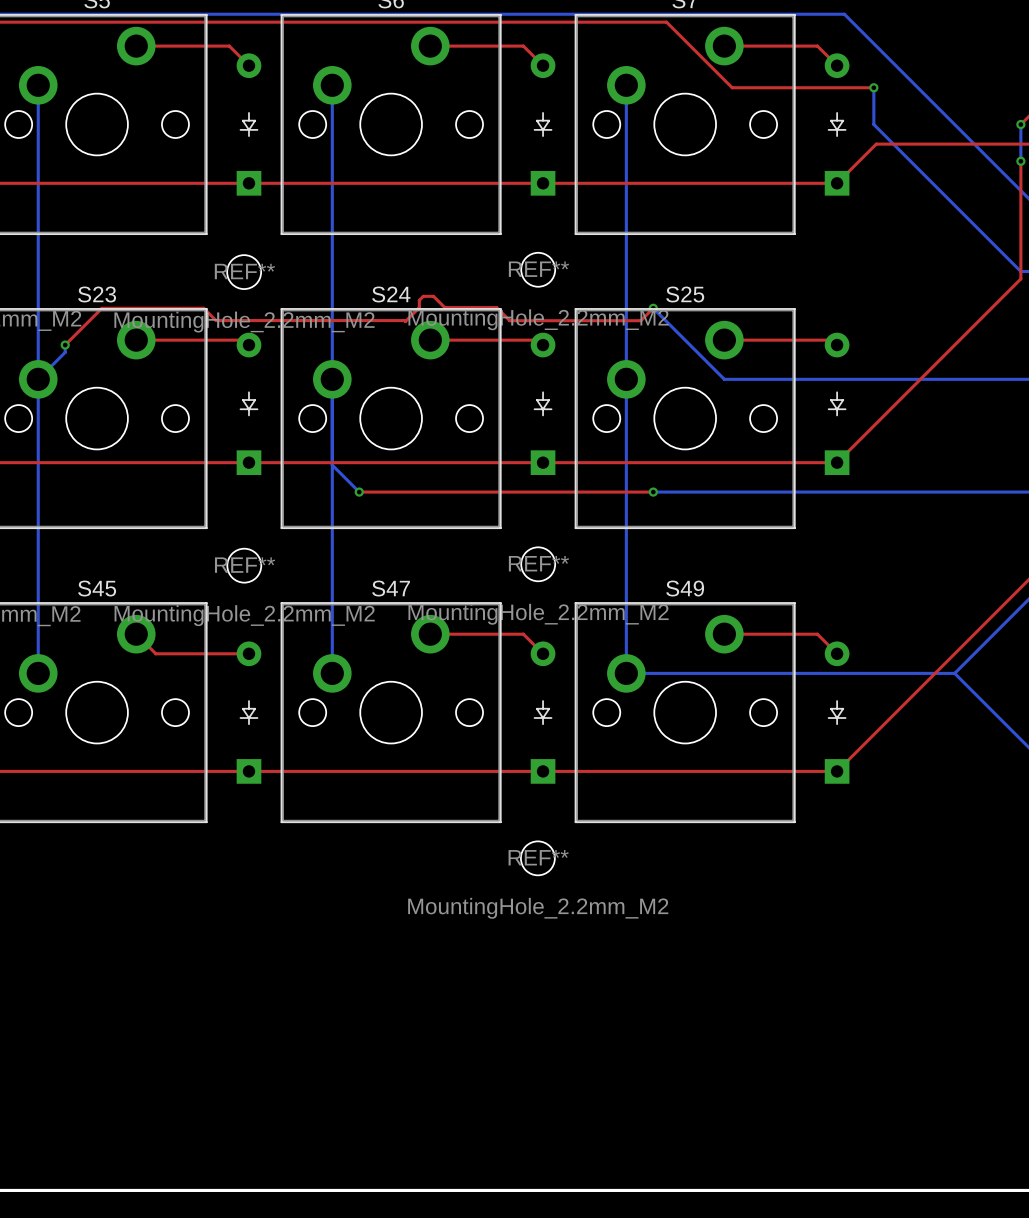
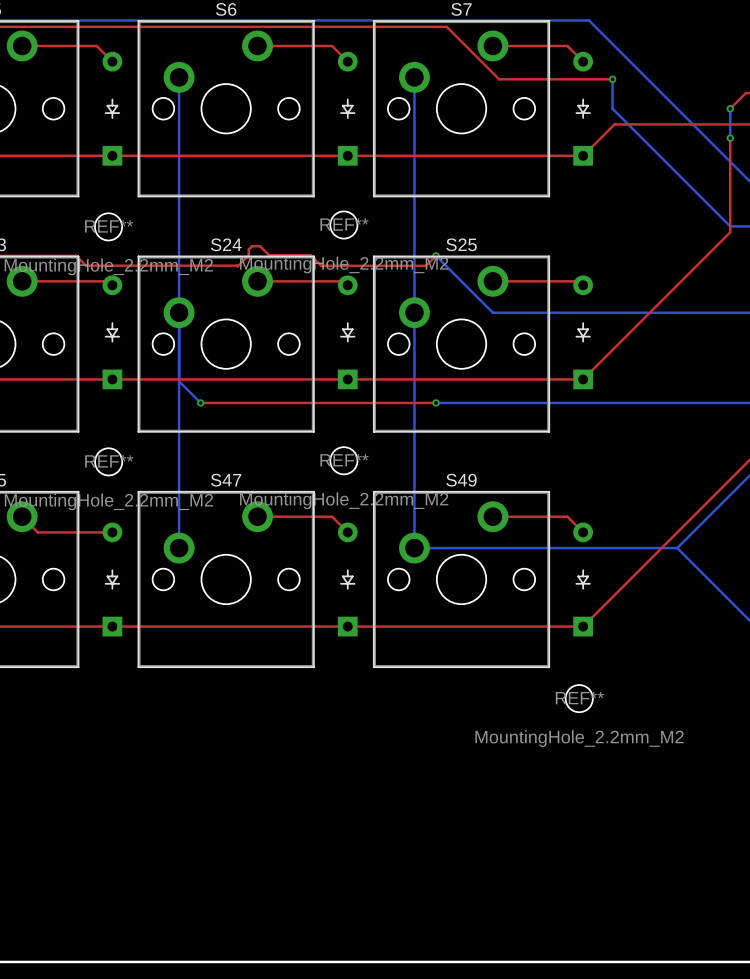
REF** position: (537, 858) -> (579, 698)

